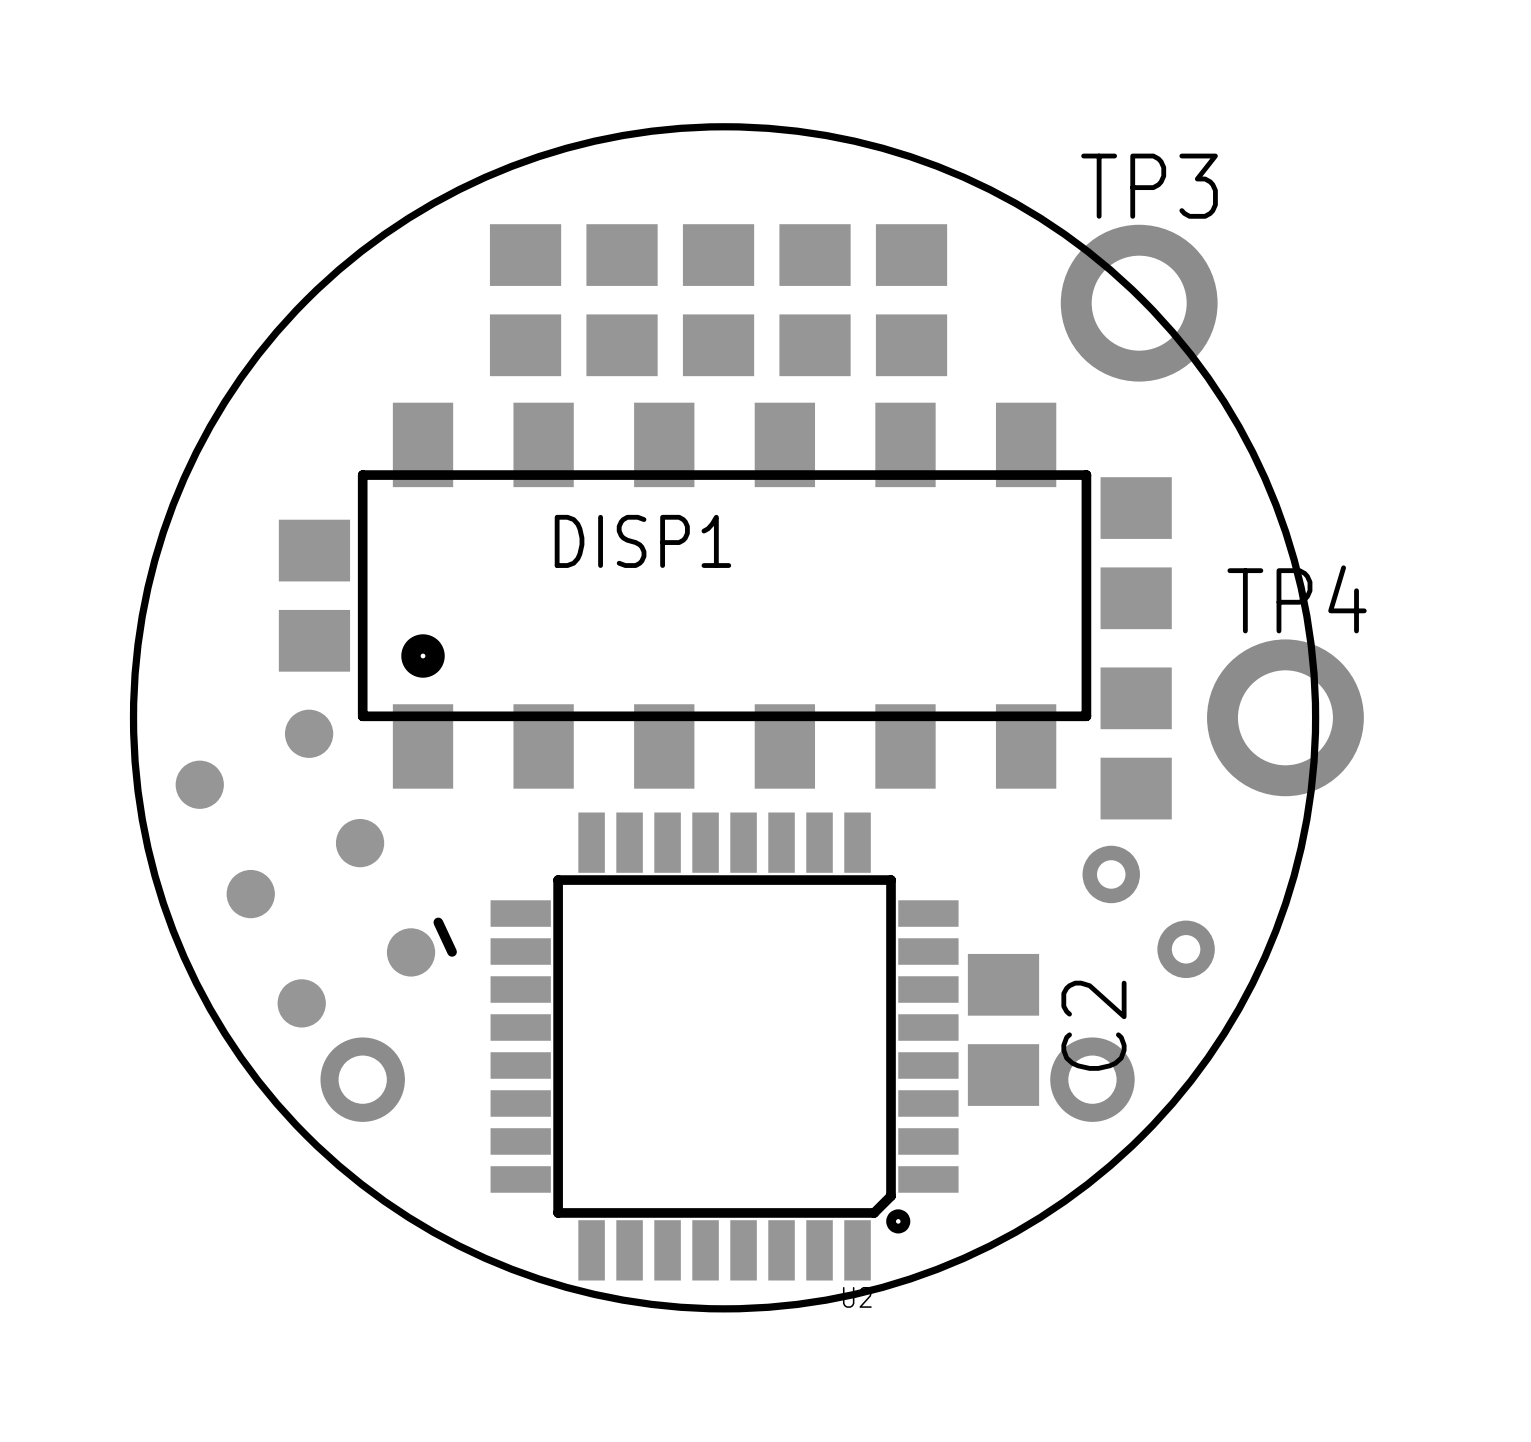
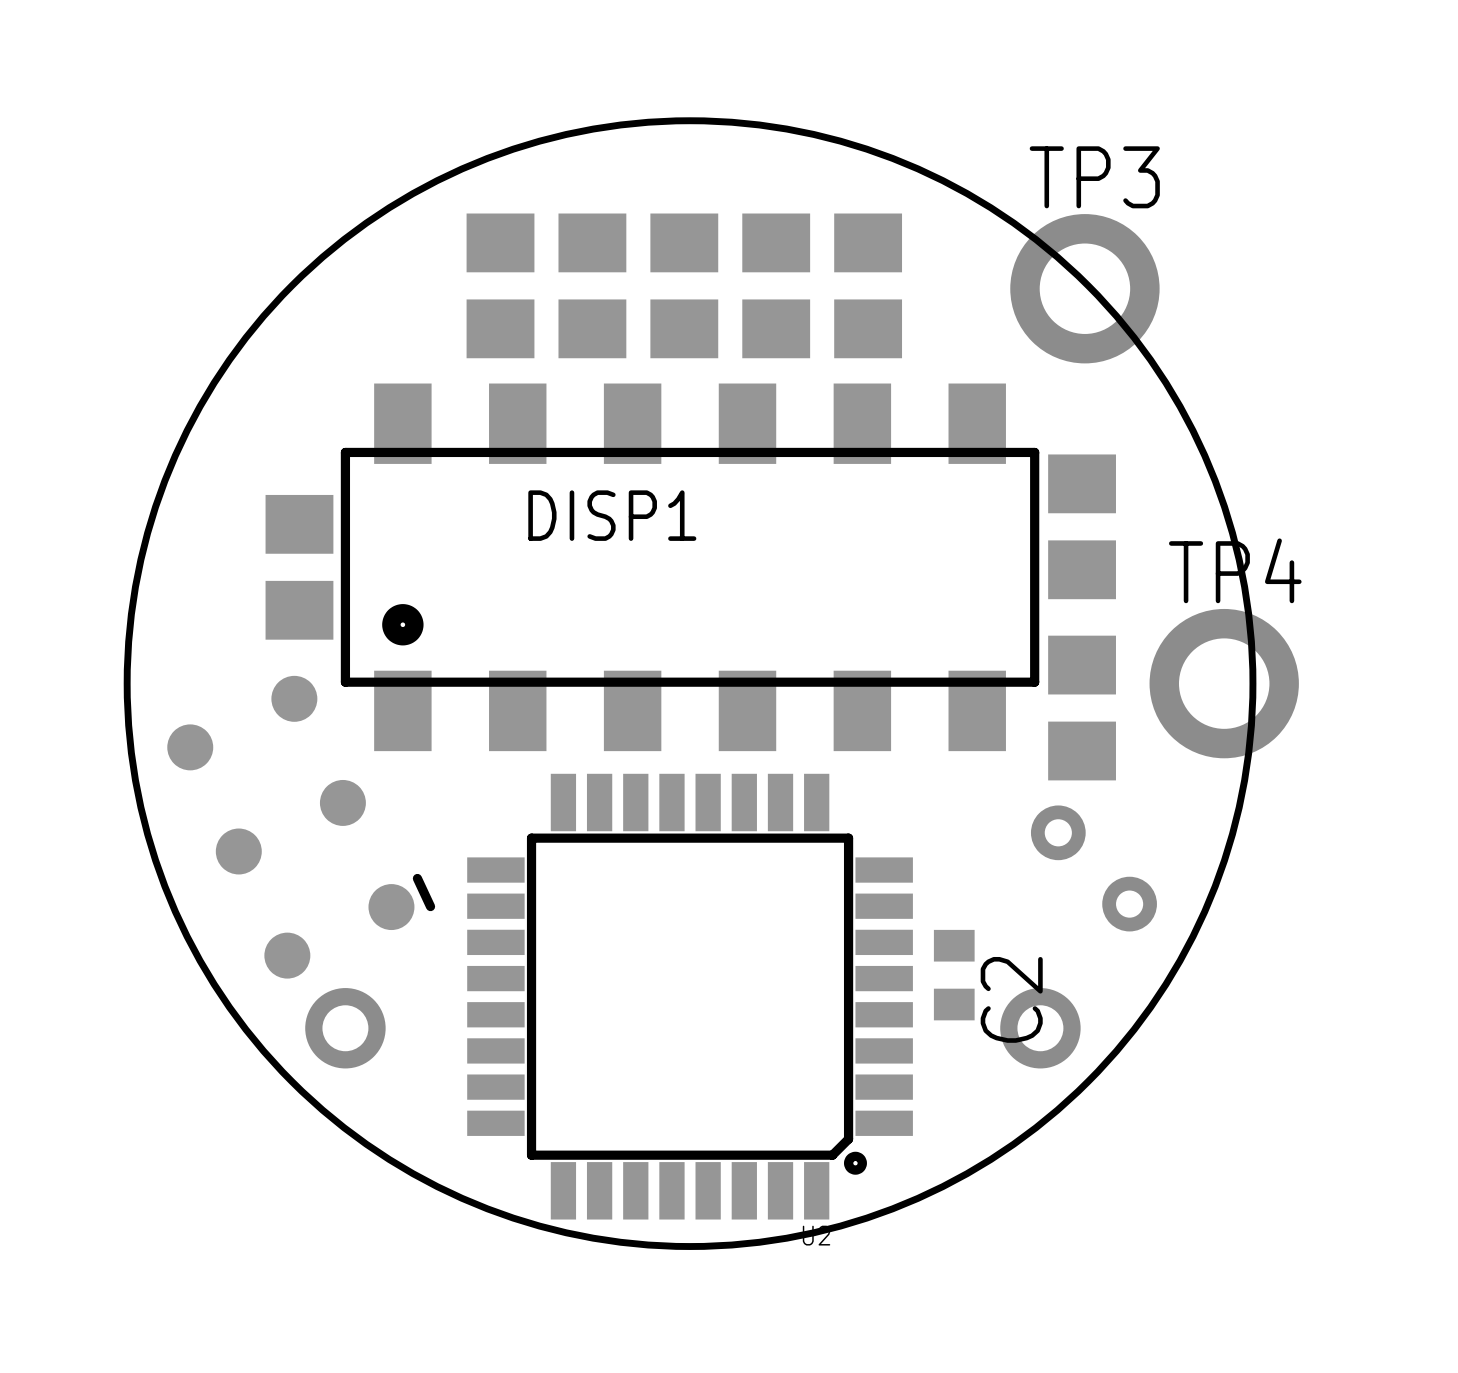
C2 footprint: [967, 953, 1040, 1106] -> [933, 929, 975, 1021]
C2 name position: C2 (1093, 1025) -> C2 (1011, 999)

